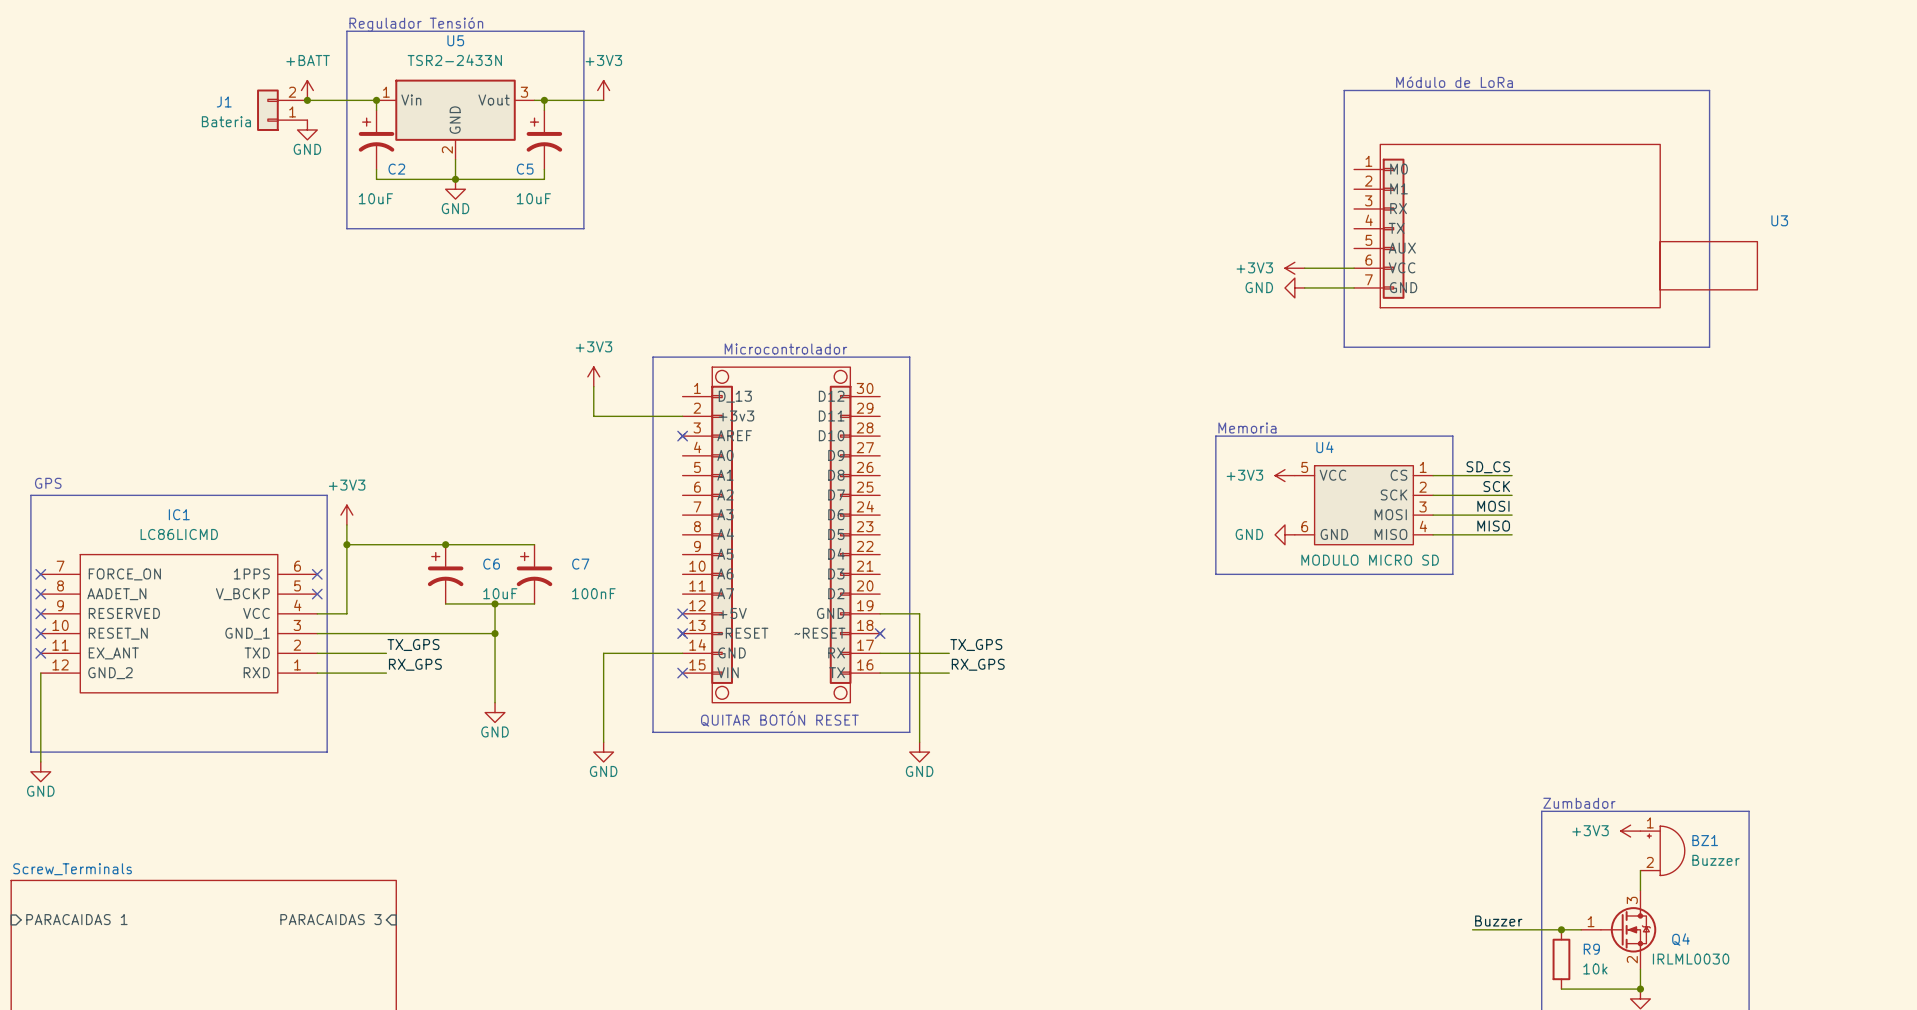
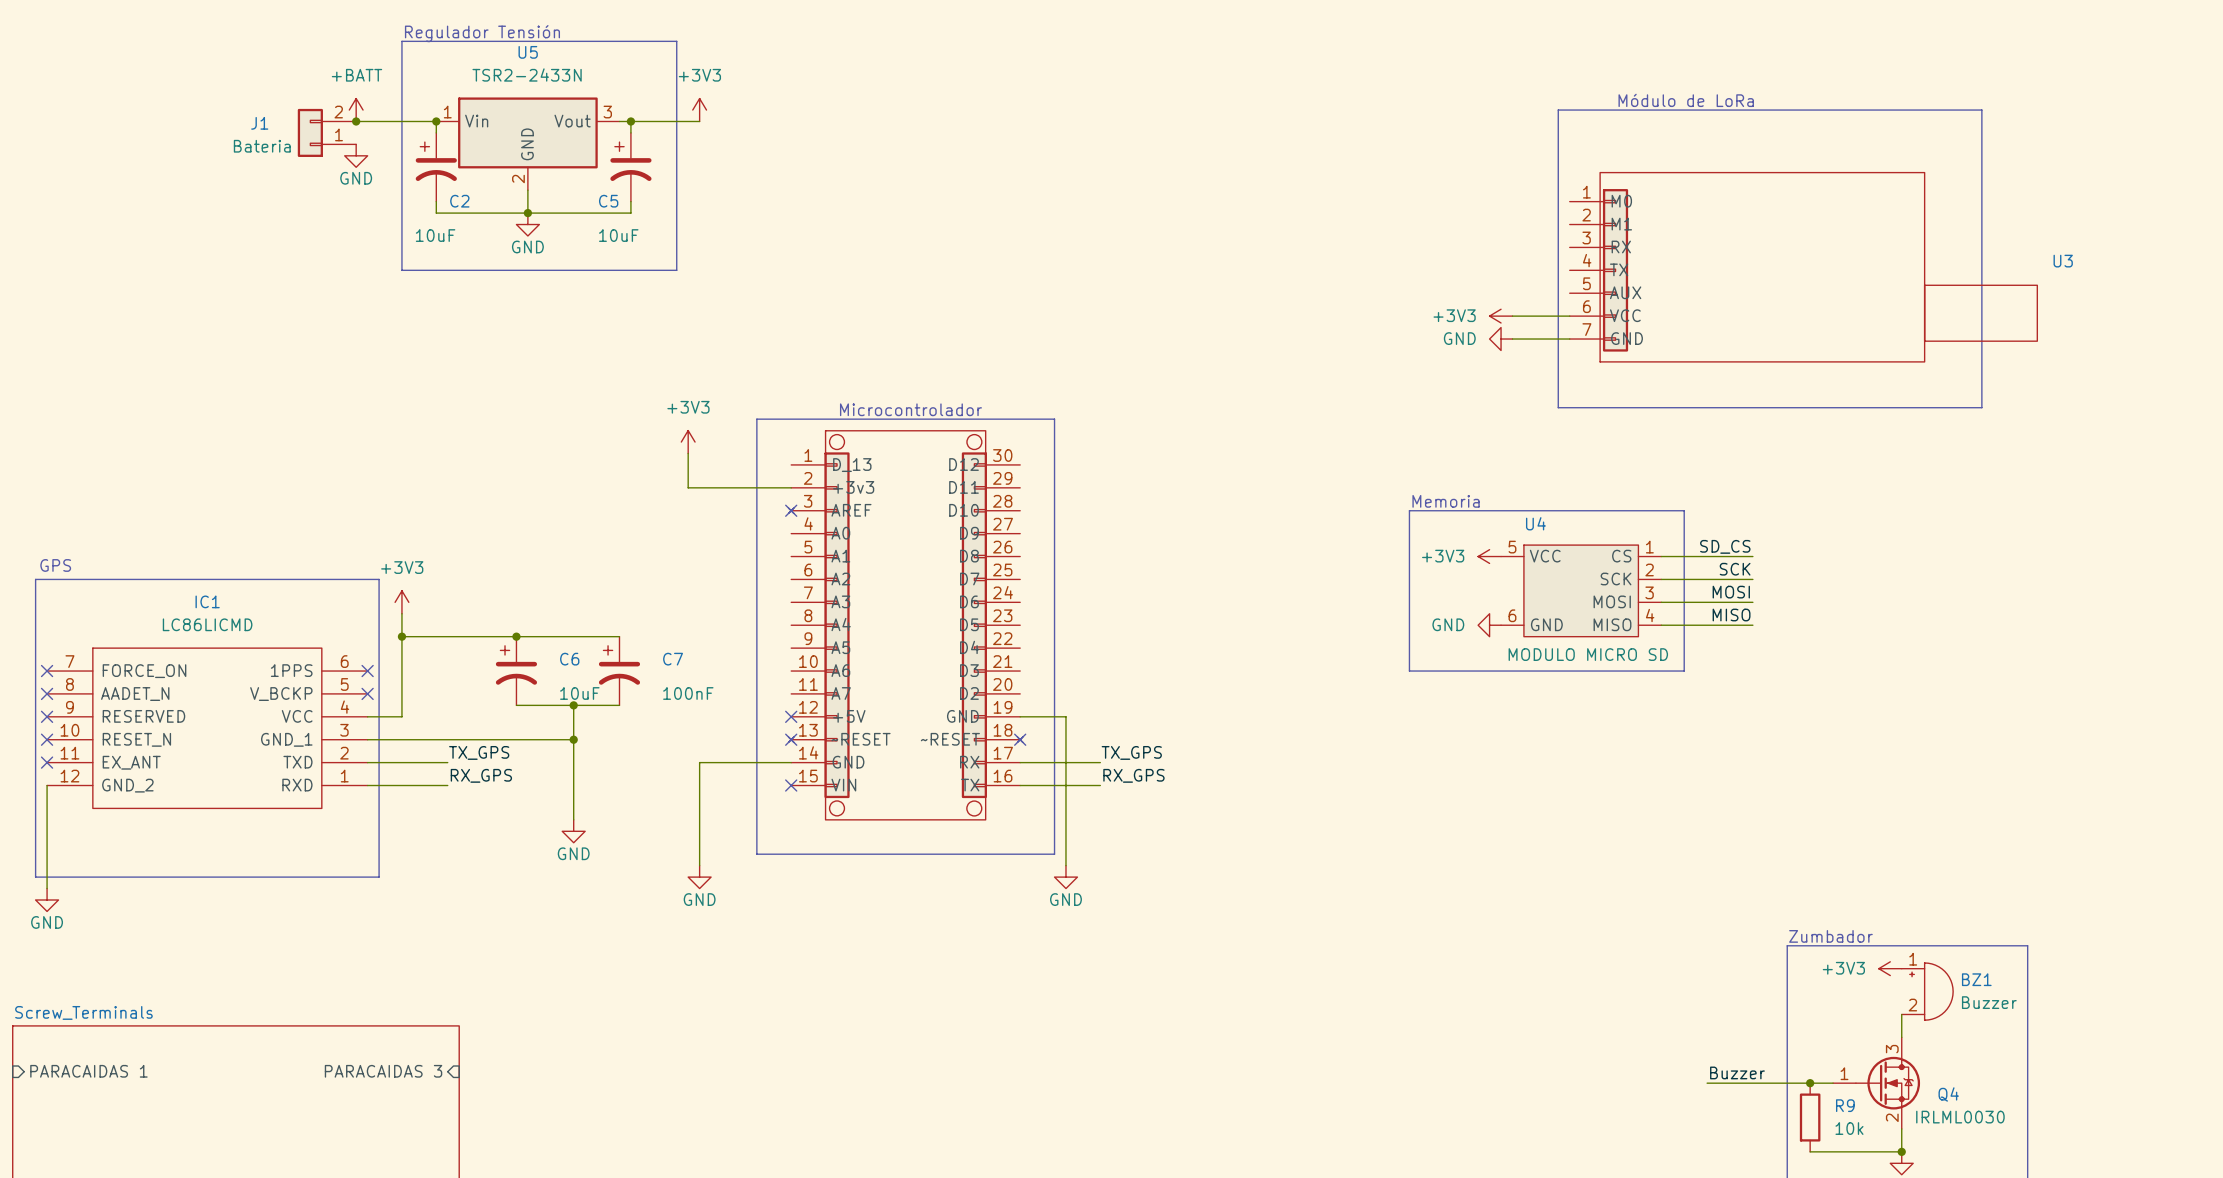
text: QUITAR BOTÓN RESET (779, 718) -> none

